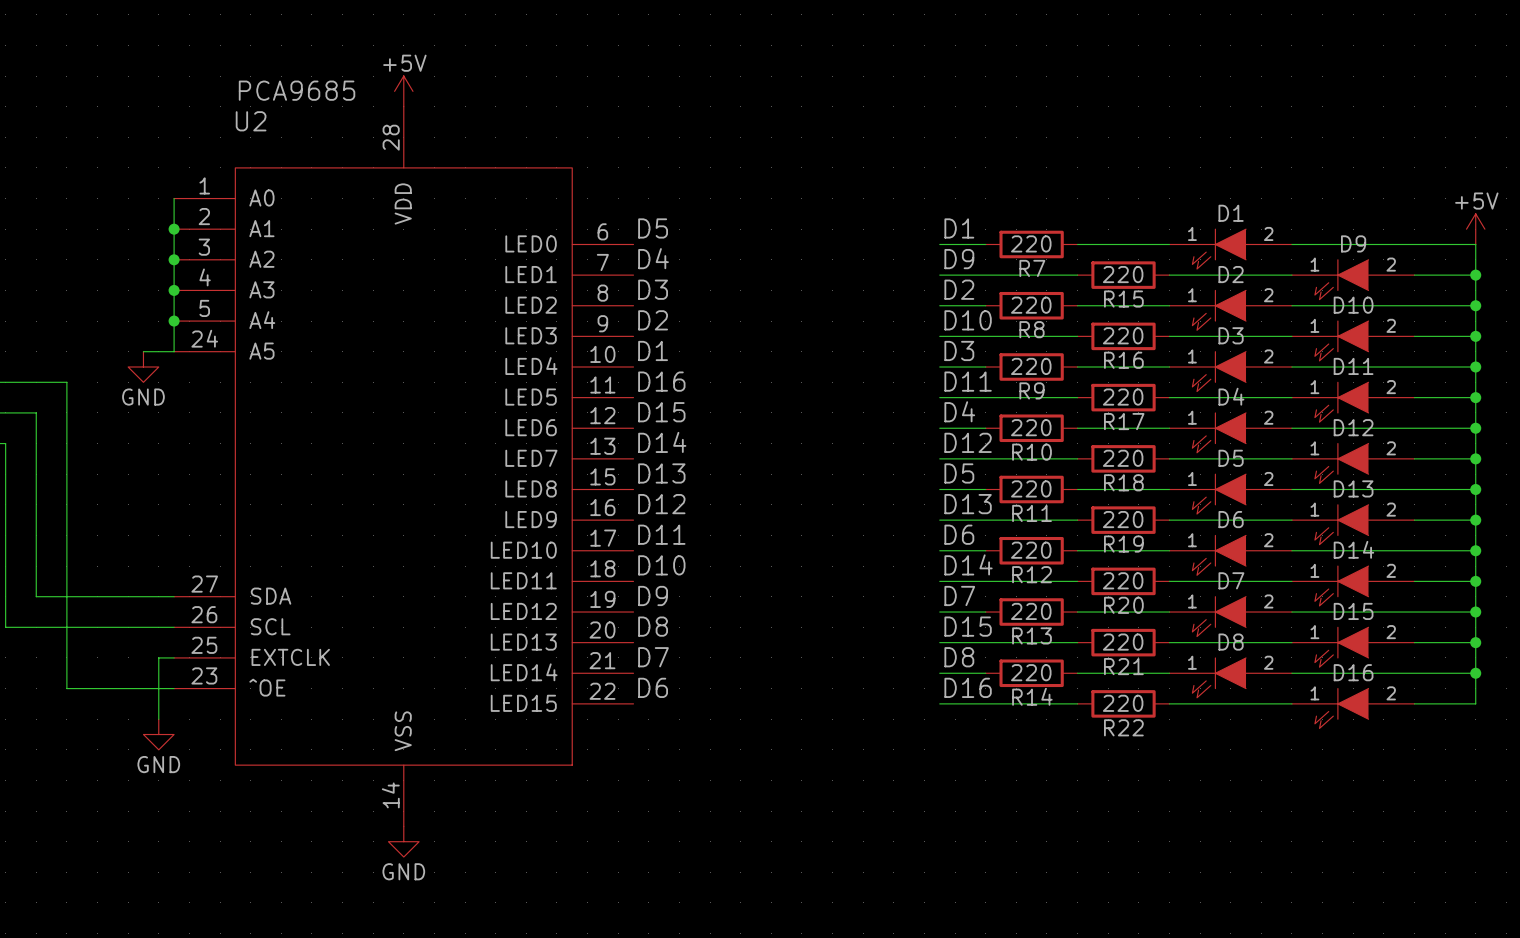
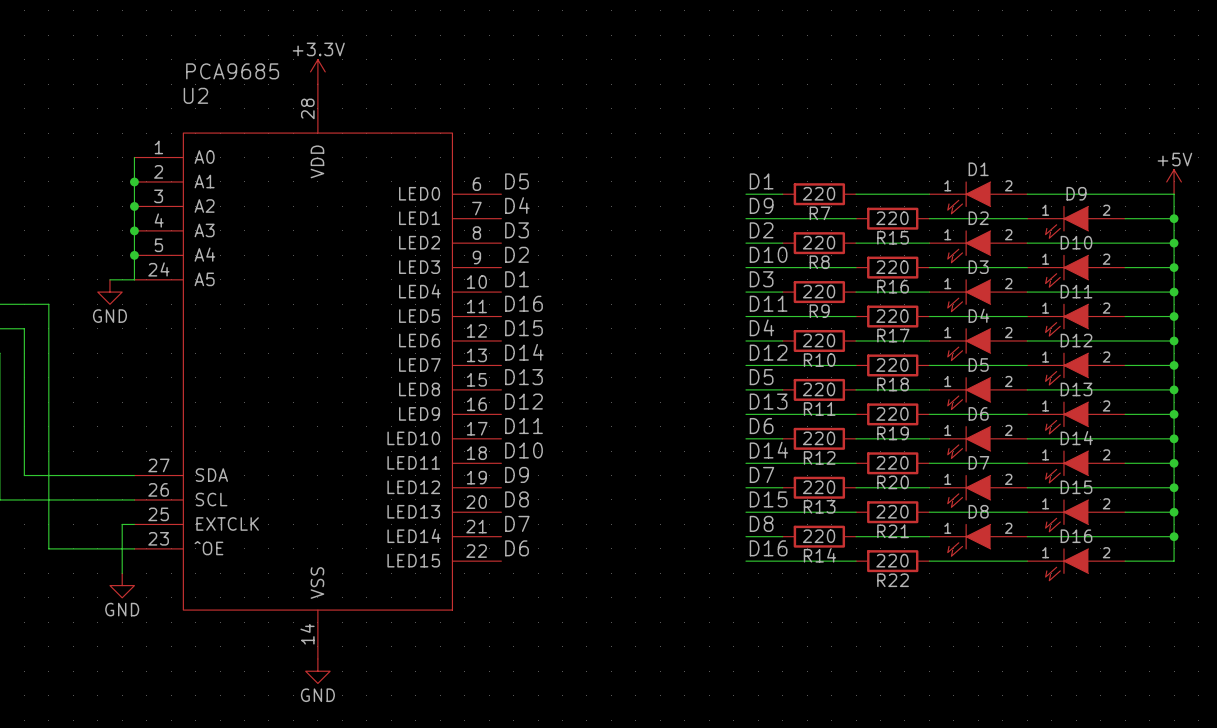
power symbol: +5V (403, 91) -> +3.3V (317, 71)

